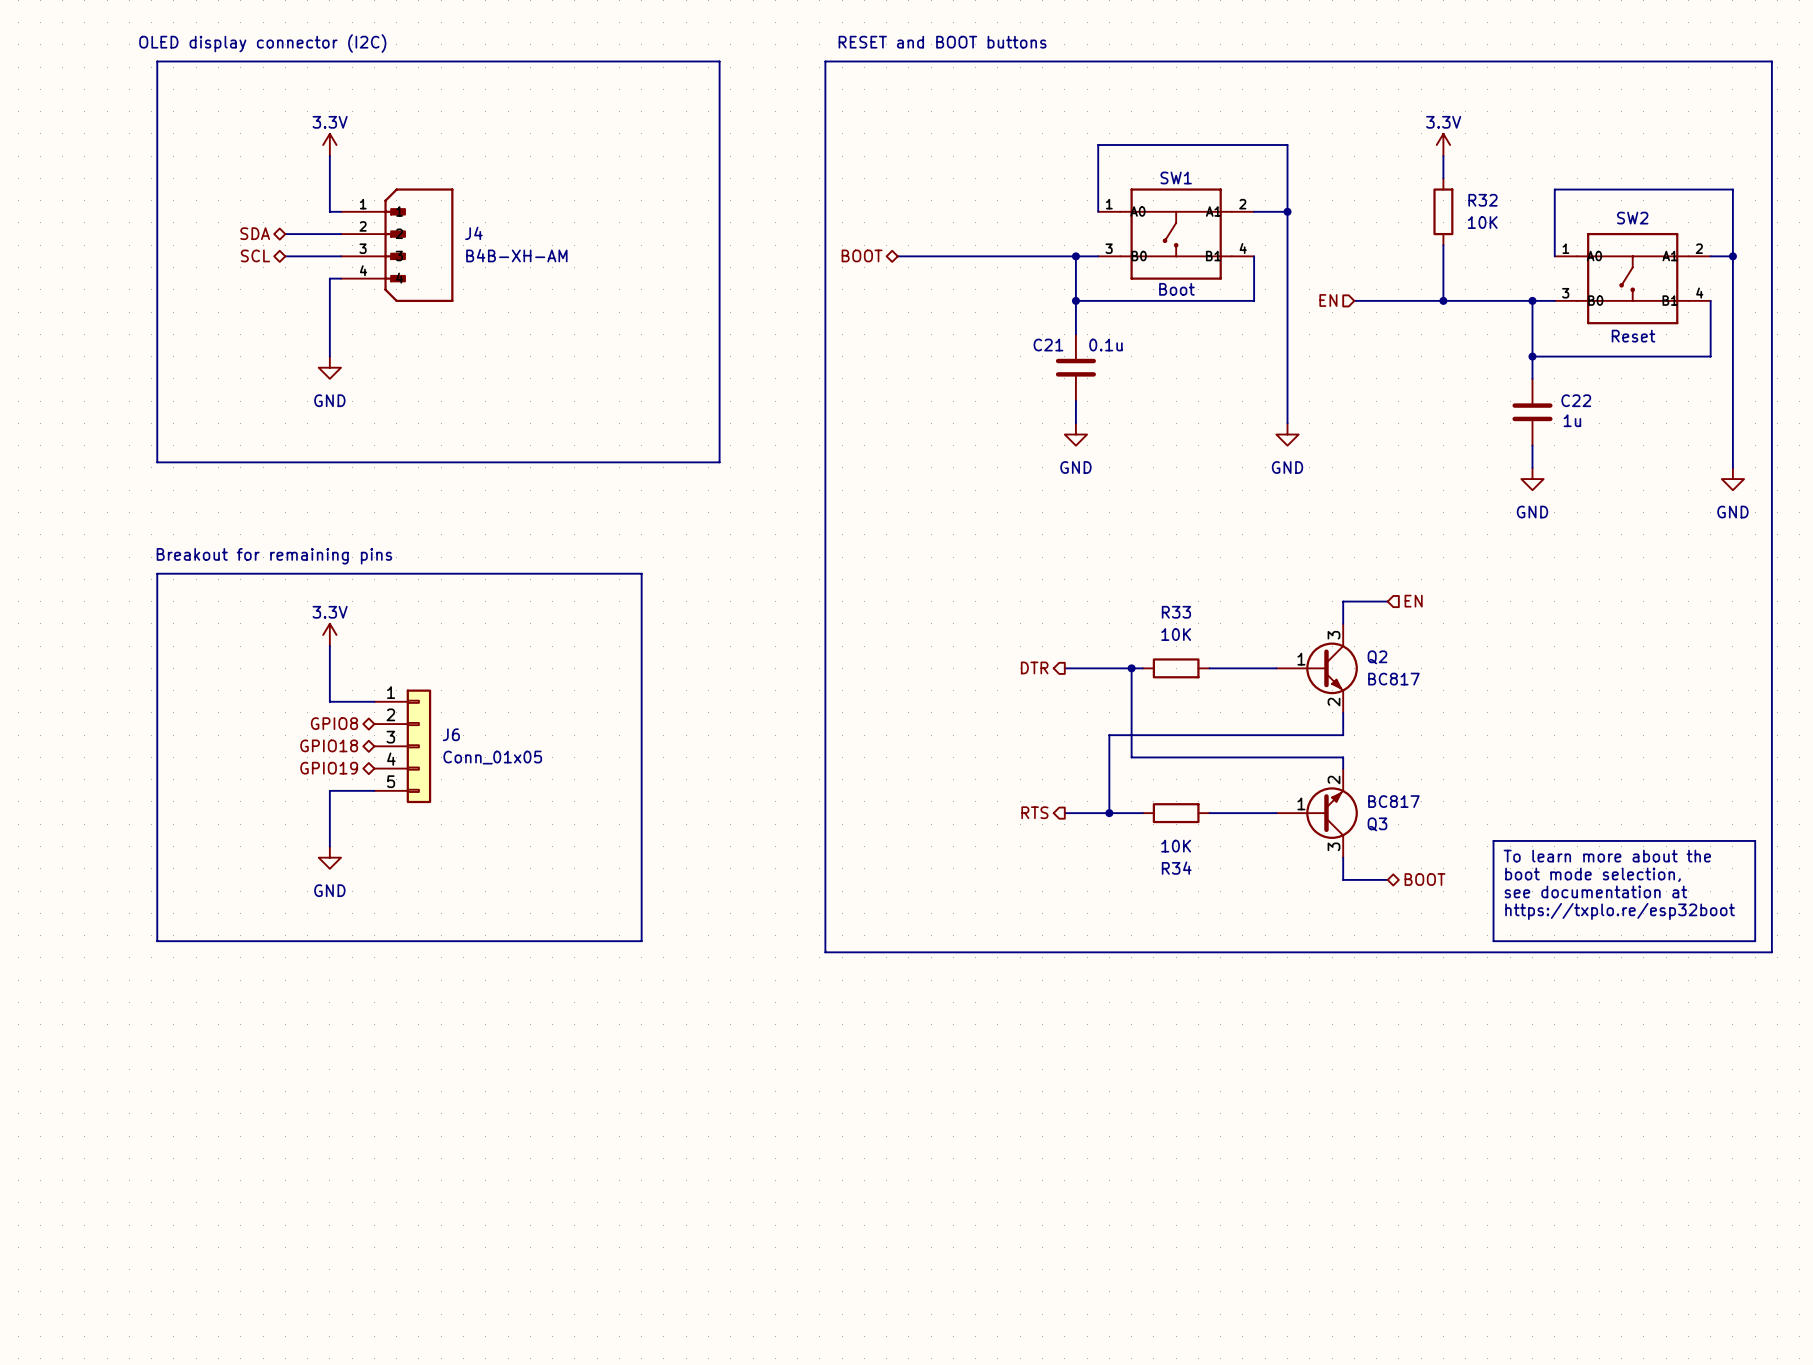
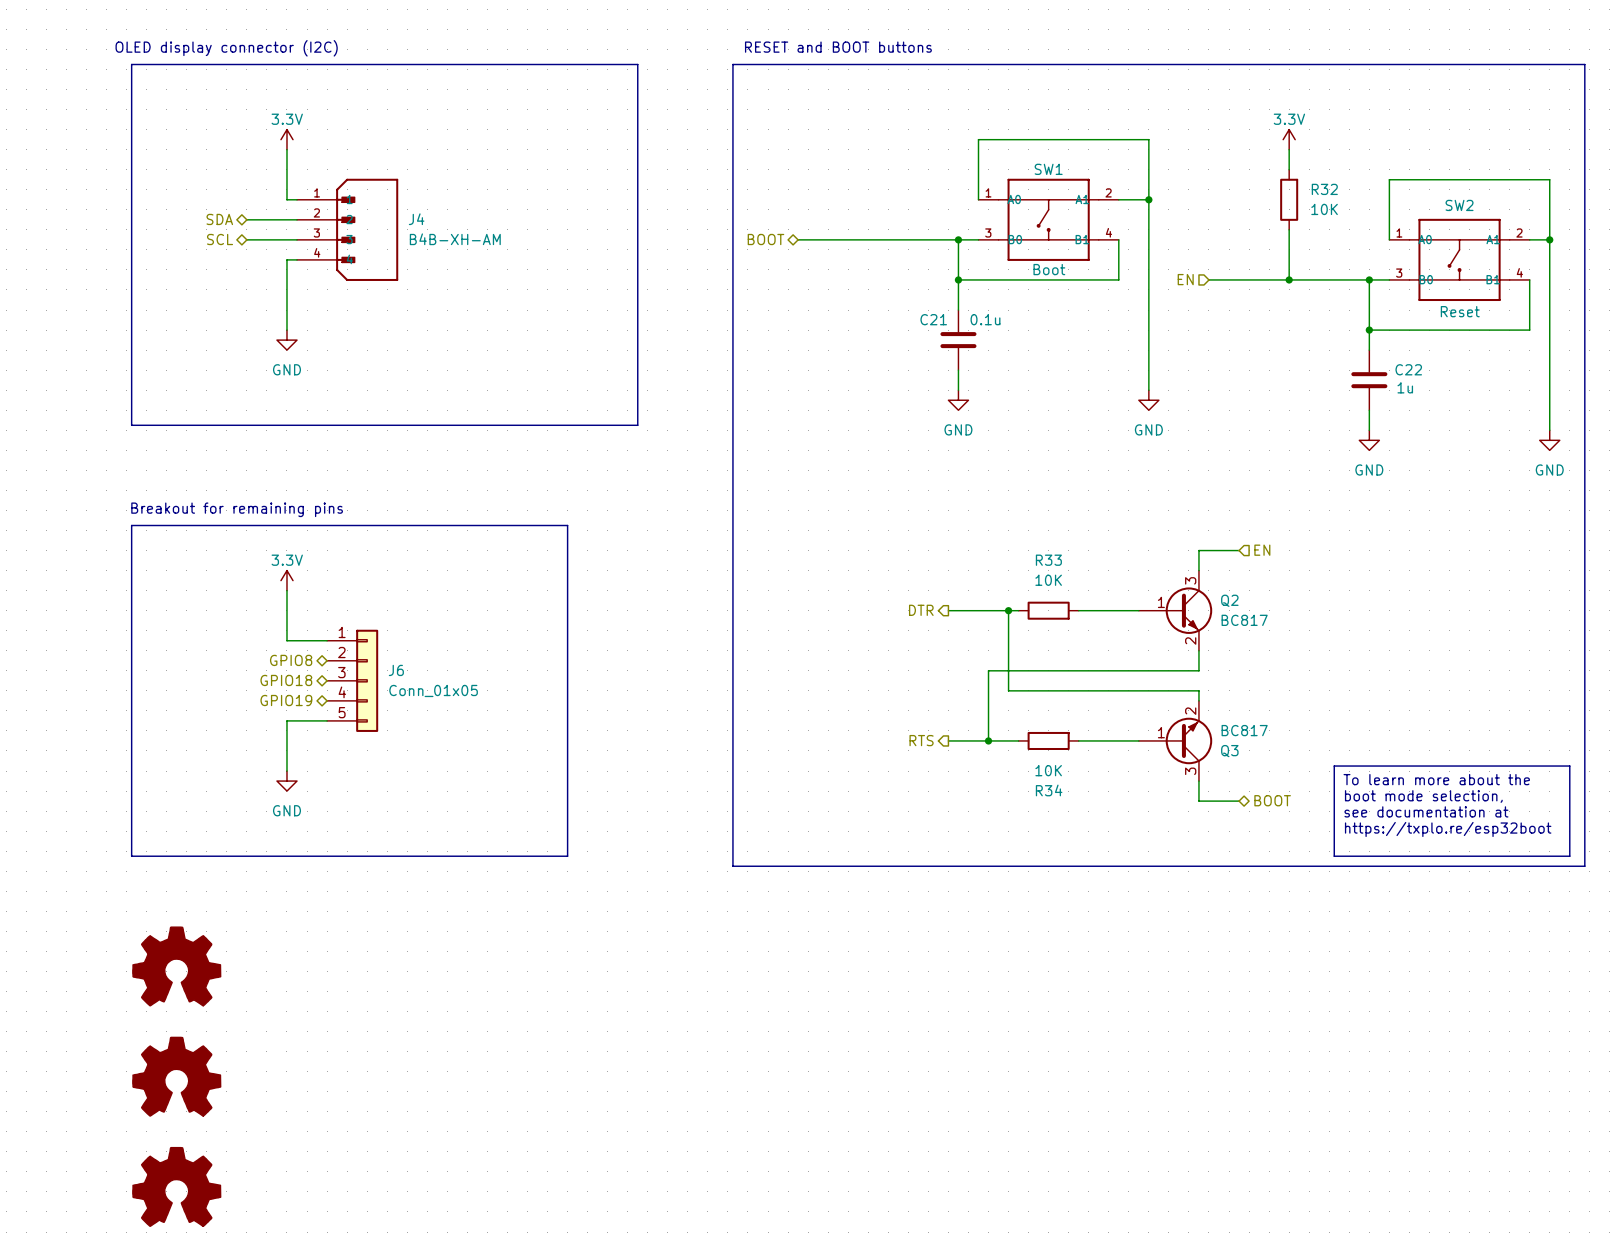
power symbol: none -> (176, 966)
power symbol: none -> (176, 1076)
power symbol: none -> (176, 1186)

